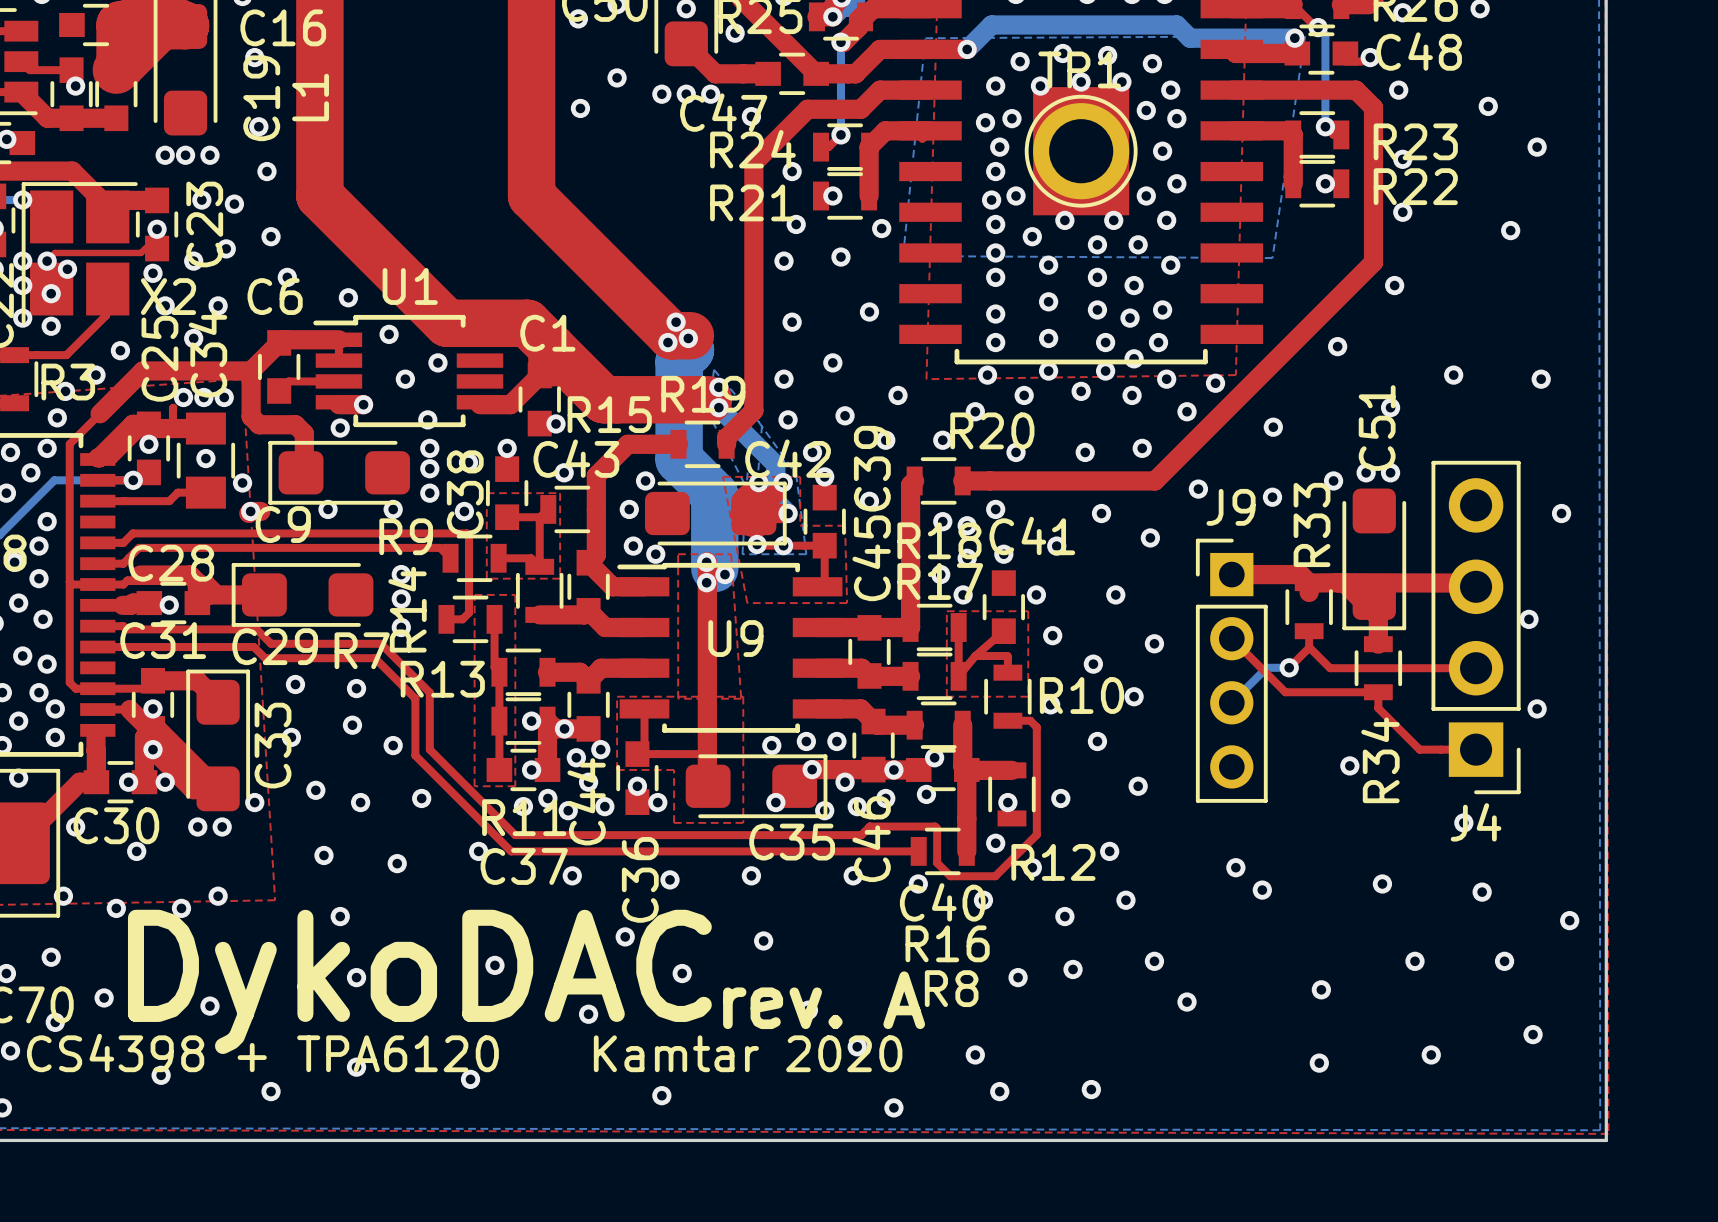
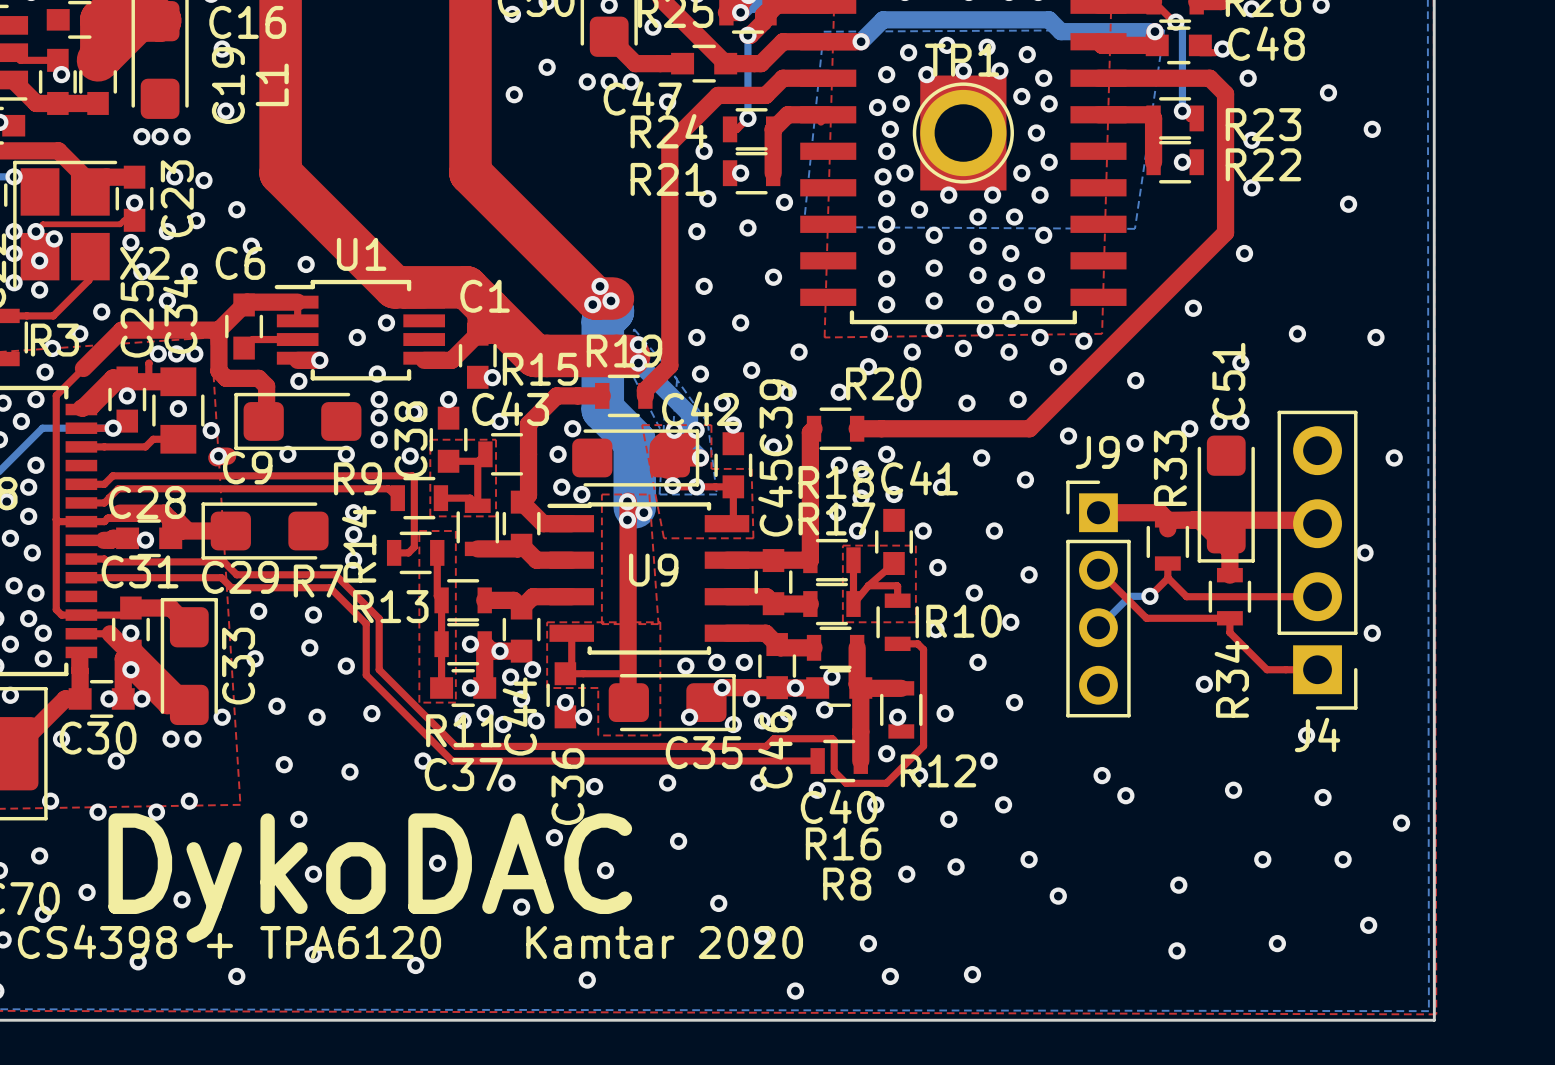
via: (266, 171) -> none
via: (389, 334) -> none
text: rev. A (824, 1000) -> none

